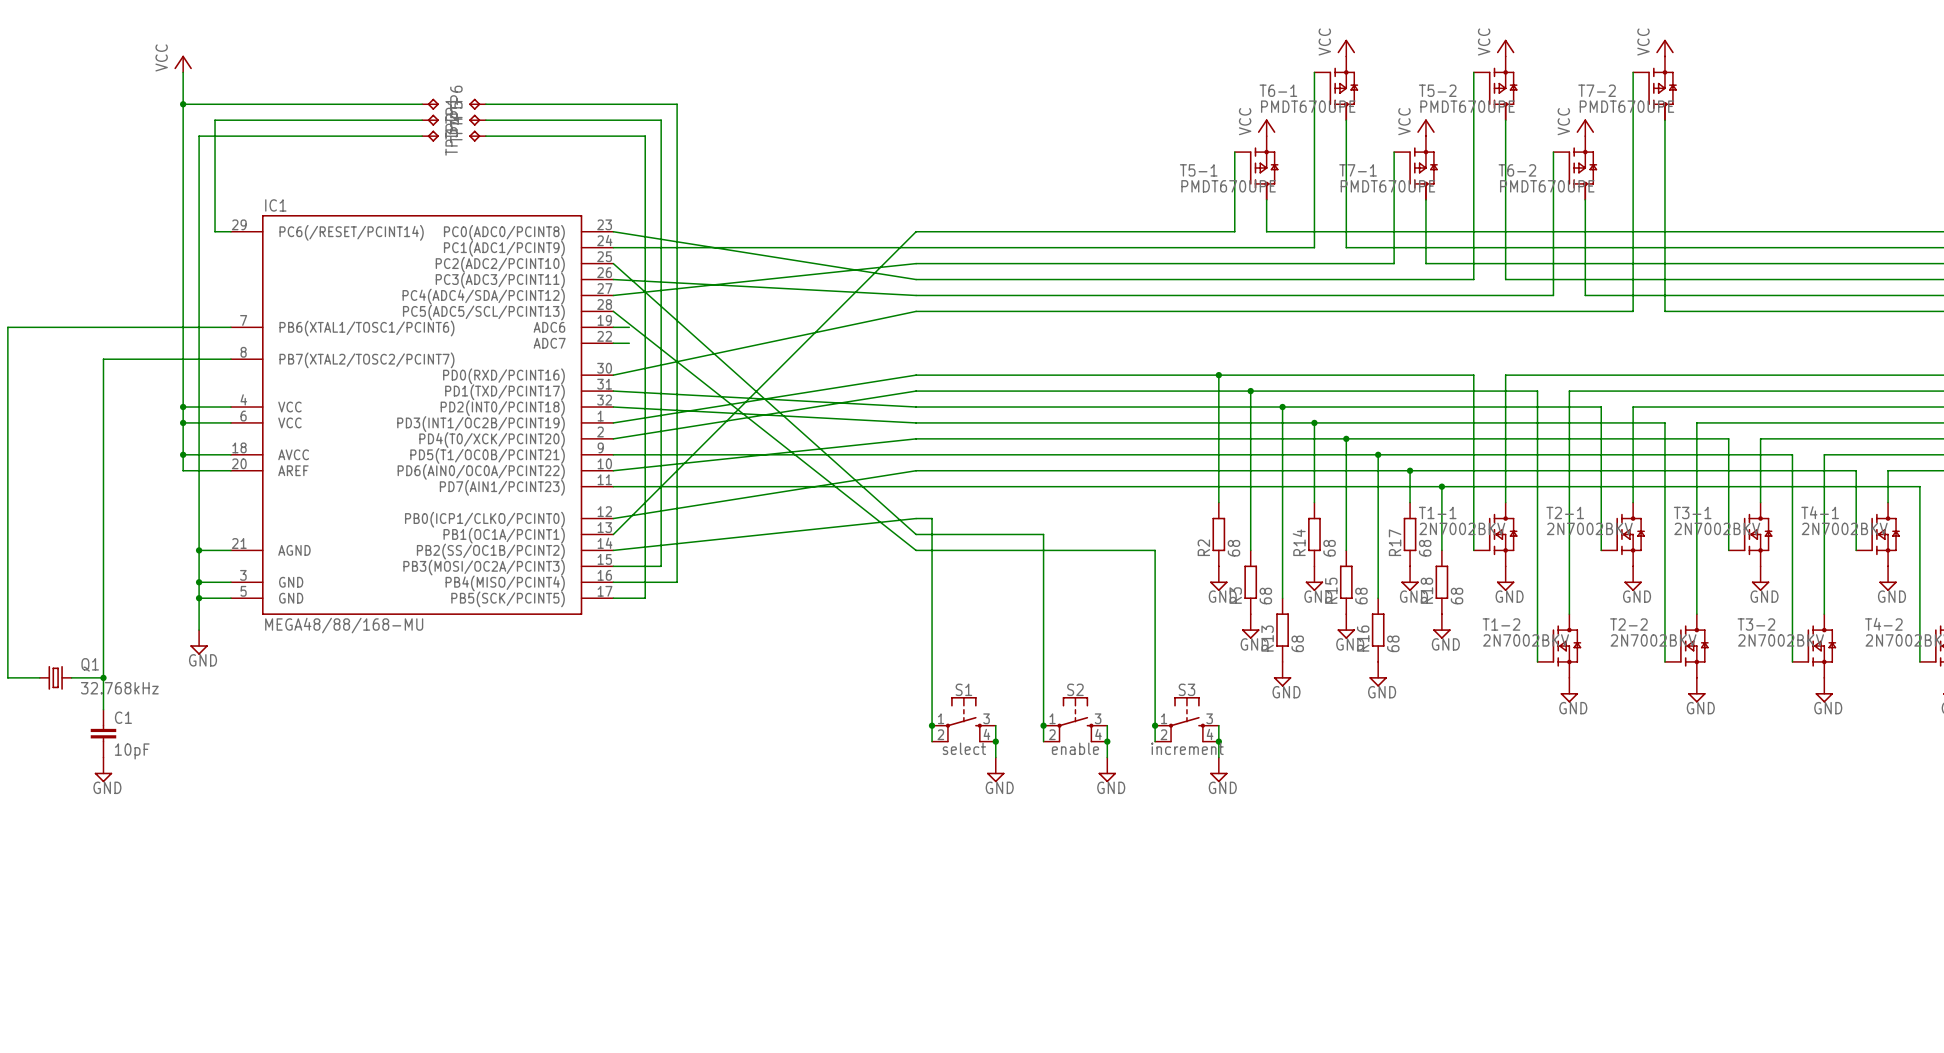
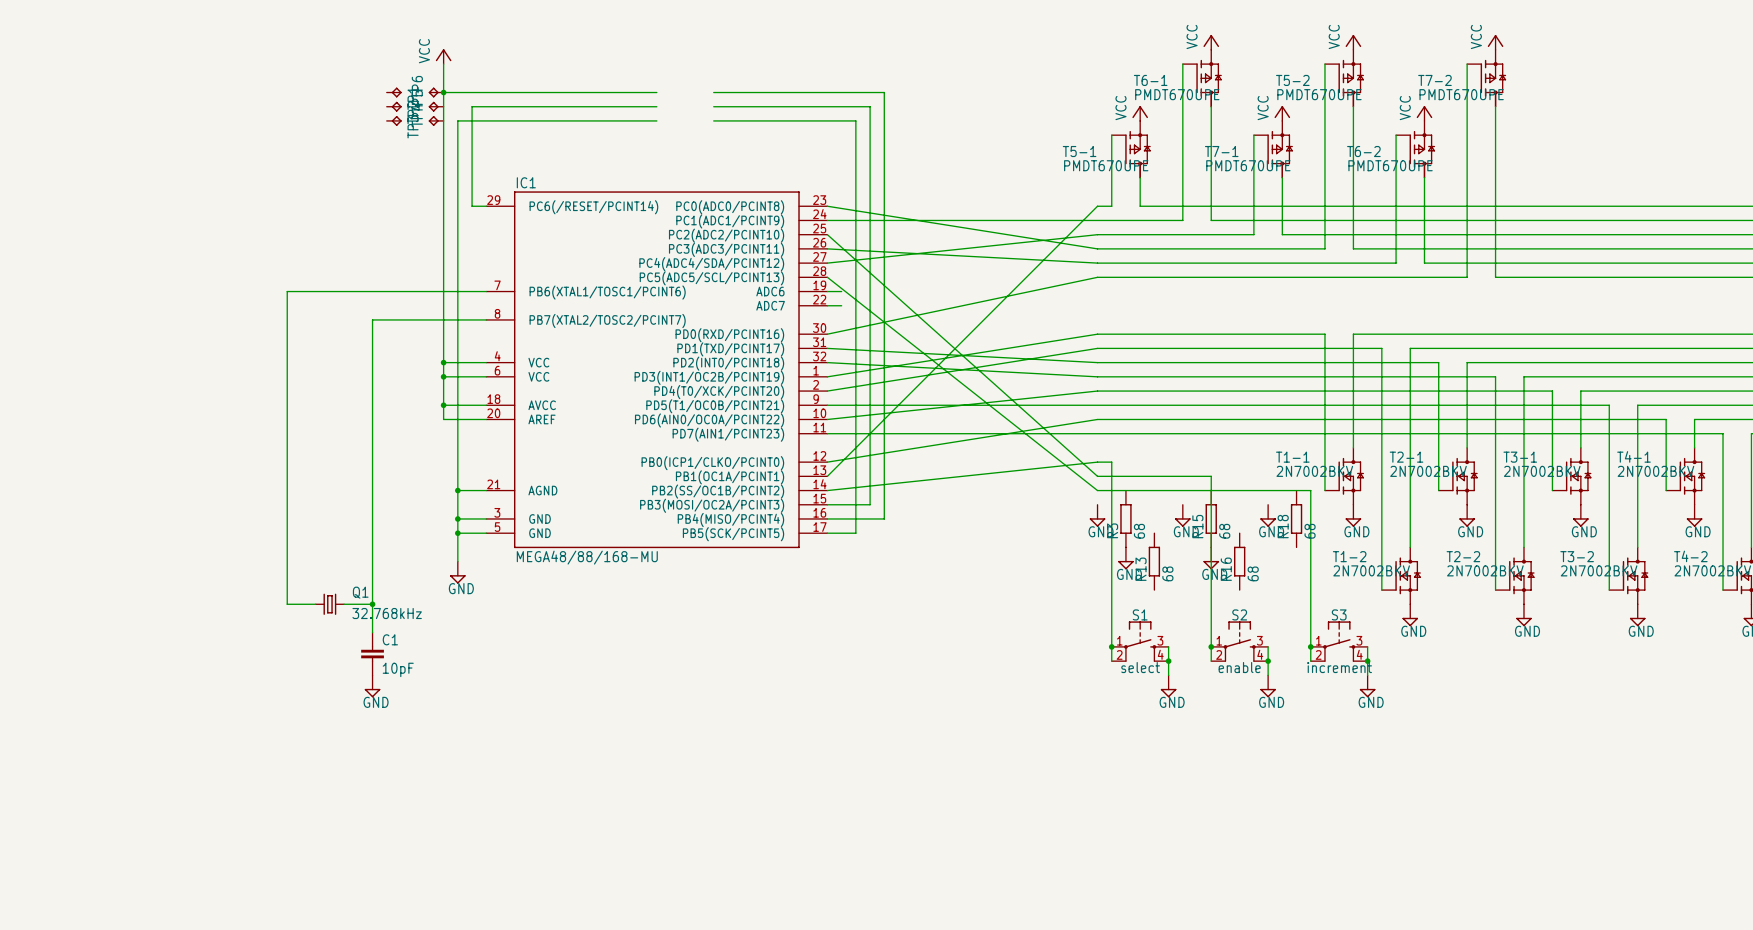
power symbol: VCC (183, 64) -> none
power symbol: none -> VCC (443, 56)
wire: (183, 72) (183, 470) (230, 470) -> none
wire: none -> (443, 64) (443, 419) (486, 419)
wire: (183, 104) (422, 104) -> none
junction: (183, 104) -> none
junction: none -> (443, 92)
wire: (677, 104) (677, 582) (613, 582) -> (614, 92) (656, 92)
wire: none -> (713, 92) (884, 92) (884, 518) (827, 518)
wire: (422, 120) (215, 120) (215, 231) (230, 231) -> none
wire: (485, 120) (517, 120) -> (486, 206) (472, 206) (472, 106)
wire: (661, 120) (661, 566) (613, 566) -> (599, 106) (656, 106)
wire: none -> (713, 106) (870, 106) (870, 504) (827, 504)
wire: (422, 136) (199, 136) (199, 630) -> none
wire: (485, 136) (501, 136) -> (457, 561) (457, 120)
wire: (645, 136) (645, 598) (613, 598) -> (585, 120) (656, 120)
wire: none -> (713, 120) (855, 120) (855, 533) (827, 533)
wire: (613, 231) (916, 279) (1218, 279) -> (827, 206) (1097, 248)
wire: (1218, 231) (916, 231) (613, 534) -> (1097, 206) (827, 476)
wire: (613, 247) (916, 247) -> none
wire: (613, 263) (916, 534) (1043, 534) (1043, 741) -> none
wire: (1218, 263) (916, 263) (613, 295) -> (1097, 234) (827, 263)
wire: (613, 279) (916, 295) (1218, 295) -> (827, 248) (1097, 263)
wire: (613, 311) (916, 550) (1155, 550) (1155, 741) -> none
wire: none -> (827, 277) (1097, 490) (1310, 490) (1310, 661)
wire: (1218, 311) (916, 311) (613, 375) -> (1097, 277) (827, 334)
wire: (230, 327) (7, 327) (7, 677) (39, 677) -> none
wire: none -> (486, 291) (287, 291) (287, 604) (315, 604)
wire: (613, 327) (629, 327) -> none
wire: none -> (827, 291) (841, 291)
wire: (613, 343) (629, 343) -> none
wire: none -> (827, 305) (841, 305)
wire: (230, 359) (103, 359) (103, 709) -> none
wire: none -> (486, 319) (372, 319) (372, 632)
wire: none -> (1097, 334) (827, 376)
junction: (1218, 375) -> none
wire: (613, 391) (916, 407) (1218, 407) -> (827, 348) (1097, 362)
wire: (1218, 391) (916, 391) (613, 438) -> (1097, 348) (827, 391)
wire: (1250, 391) (1250, 550) -> none
junction: (1250, 391) -> none
wire: (183, 407) (230, 407) -> none
junction: (183, 407) -> none
wire: none -> (443, 362) (486, 362)
junction: none -> (443, 362)
wire: (613, 407) (916, 422) (1218, 422) -> (827, 362) (1097, 376)
wire: (1282, 407) (1282, 598) -> none
junction: (1282, 407) -> none
IC1 position: (422, 414) -> (656, 369)
wire: (183, 422) (230, 422) -> none
junction: (183, 422) -> none
wire: none -> (443, 376) (486, 376)
junction: none -> (443, 376)
wire: (613, 422) (916, 375) (1218, 375) (1218, 502) -> none
wire: (1314, 422) (1314, 502) -> none
junction: (1314, 422) -> none
wire: (1218, 438) (916, 438) (613, 470) -> (1097, 391) (827, 419)
wire: (1346, 438) (1346, 534) -> (827, 234) (1097, 476) (1211, 476)
junction: (1346, 438) -> none
wire: (183, 454) (230, 454) -> none
junction: (183, 454) -> none
wire: none -> (443, 405) (486, 405)
junction: none -> (443, 405)
wire: (613, 454) (916, 454) -> none
wire: (1378, 454) (1378, 598) -> none
junction: (1378, 454) -> none
wire: (1218, 470) (916, 470) (613, 518) -> (1097, 419) (827, 462)
wire: (1410, 470) (1410, 502) -> none
junction: (1410, 470) -> none
wire: (613, 486) (916, 486) -> none
wire: (1441, 486) (1441, 550) -> none
junction: (1441, 486) -> none
R2: 68 (1218, 534) -> none
R14: 68 (1314, 534) -> none
R17: 68 (1410, 534) -> none
wire: (199, 550) (230, 550) -> none
junction: (199, 550) -> none
wire: none -> (457, 490) (486, 490)
junction: none -> (457, 490)
wire: (613, 550) (916, 518) (932, 518) (932, 741) -> none
wire: none -> (827, 490) (1111, 462) (1111, 661)
wire: none -> (1211, 490) (1211, 661)
wire: (199, 582) (230, 582) -> none
junction: (199, 582) -> none
wire: none -> (457, 518) (486, 518)
junction: none -> (457, 518)
wire: (199, 598) (230, 598) -> none
junction: (199, 598) -> none
wire: none -> (457, 533) (486, 533)
junction: none -> (457, 533)
power symbol: GND (1441, 626) -> none
power symbol: GND (199, 642) -> none
power symbol: none -> GND (457, 572)
power symbol: GND (1282, 674) -> none
power symbol: GND (1378, 674) -> none
Q1 position: (55, 677) -> (329, 604)
wire: (71, 677) (103, 677) -> none
junction: (103, 677) -> none
wire: none -> (344, 604) (372, 604)
junction: none -> (372, 604)
S1 position: (963, 719) -> (1140, 641)
S2 position: (1075, 719) -> (1239, 641)
S3 position: (1186, 719) -> (1339, 641)
junction: (932, 725) -> none
wire: (995, 725) (995, 757) -> none
junction: (1043, 725) -> none
wire: (1107, 725) (1107, 757) -> none
junction: (1155, 725) -> none
wire: (1218, 725) (1218, 757) -> (1168, 646) (1168, 675)
junction: none -> (1211, 646)
wire: none -> (1268, 646) (1268, 675)
junction: none -> (1310, 646)
wire: none -> (1367, 646) (1367, 675)
C1 position: (103, 733) -> (372, 654)
junction: (995, 741) -> none
junction: (1107, 741) -> none
junction position: (1218, 741) -> (1111, 646)
junction: none -> (1168, 661)
junction: none -> (1268, 661)
junction: none -> (1367, 661)
power symbol: GND (103, 769) -> none
power symbol: none -> GND (372, 686)
power symbol: GND (995, 769) -> none
power symbol: GND (1107, 769) -> none
power symbol: GND (1218, 769) -> none
power symbol: none -> GND (1168, 686)
power symbol: none -> GND (1268, 686)
power symbol: none -> GND (1367, 686)

